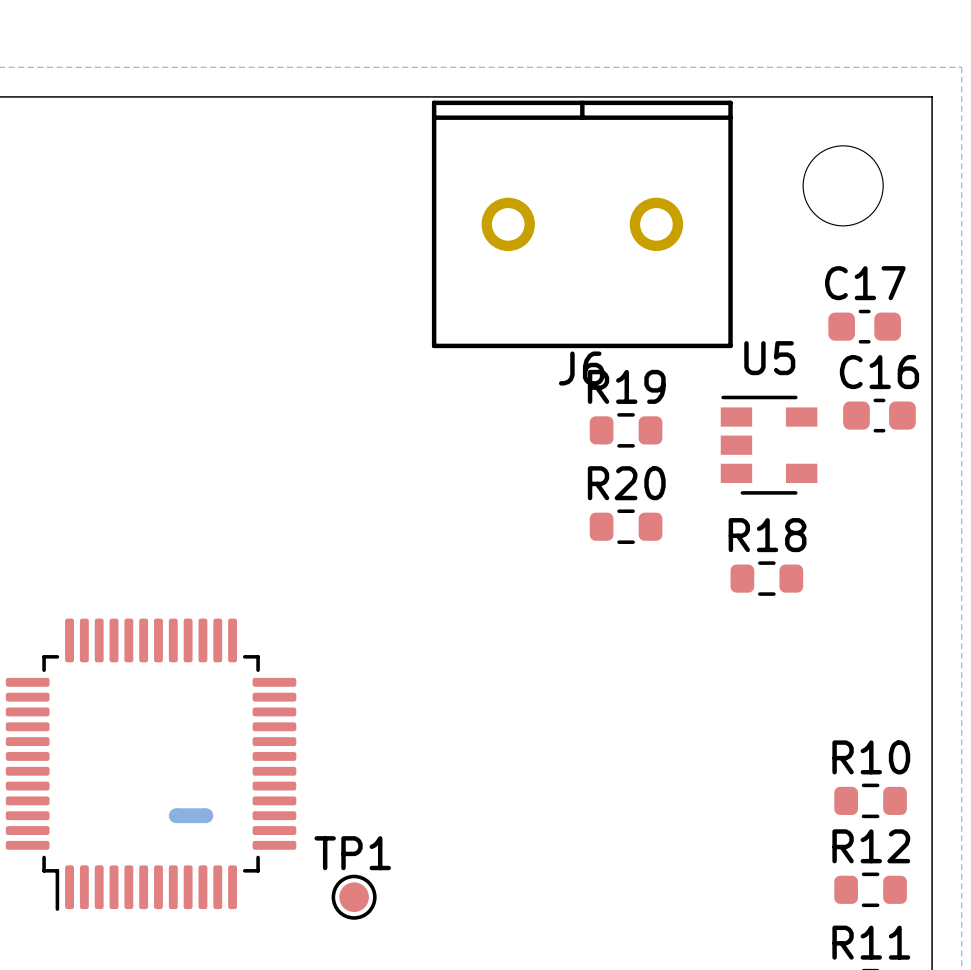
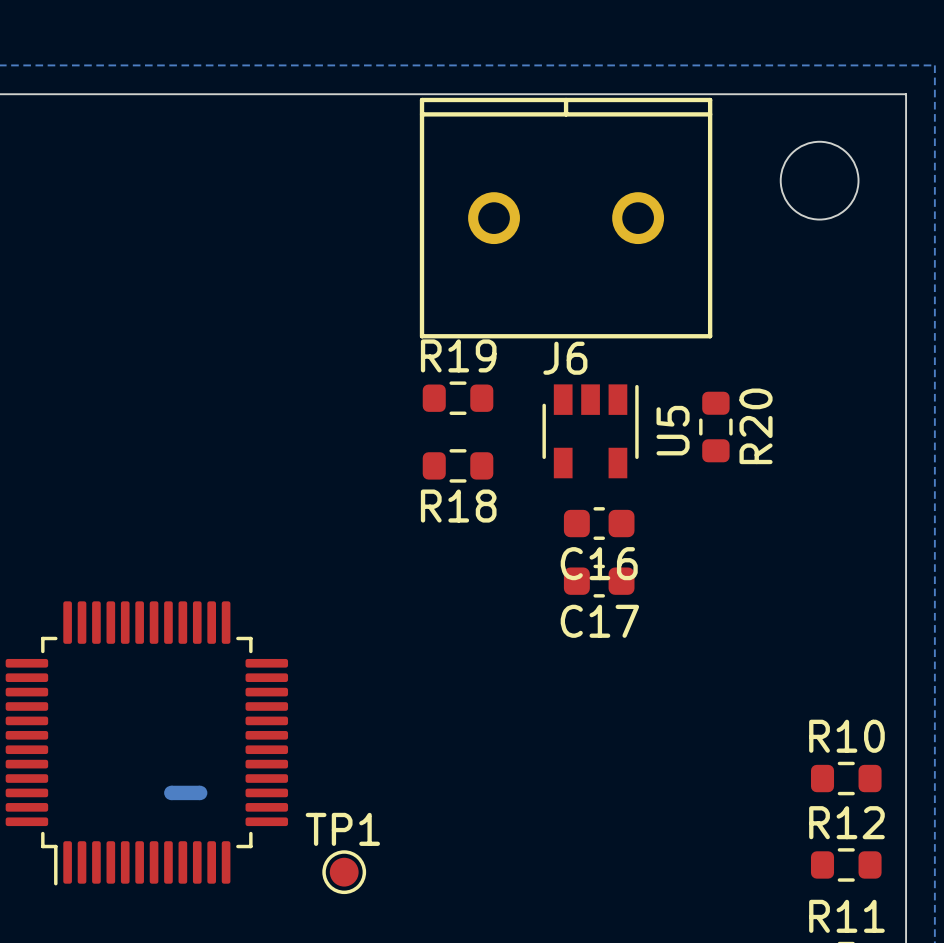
C17 name position: C17 (865, 283) -> C17 (599, 621)
C17 position: (864, 326) -> (599, 581)
C16 name position: C16 (879, 372) -> C16 (599, 563)
C16 position: (879, 415) -> (599, 523)
R19 position: (626, 430) -> (458, 398)
U5 rotation: 0° (769, 445) -> 90° clockwise (590, 431)
U5 position: (769, 445) -> (590, 431)
R20 rotation: 0° (626, 526) -> 90° clockwise (715, 427)
R20 position: (626, 526) -> (715, 427)
R18 name position: R18 (767, 535) -> R18 (458, 506)
R18 position: (766, 578) -> (458, 465)

